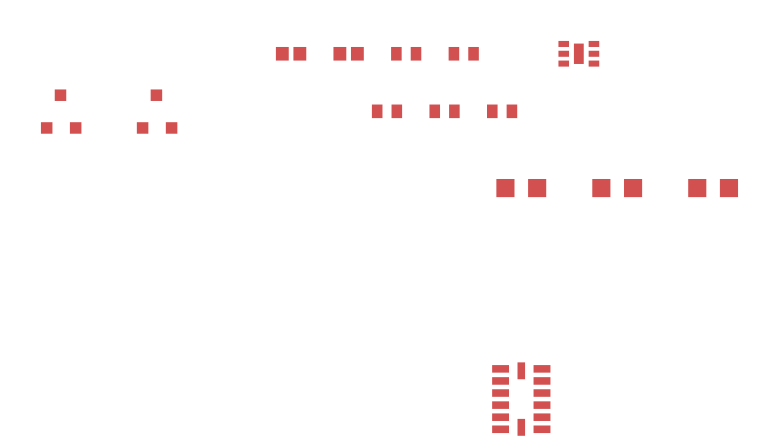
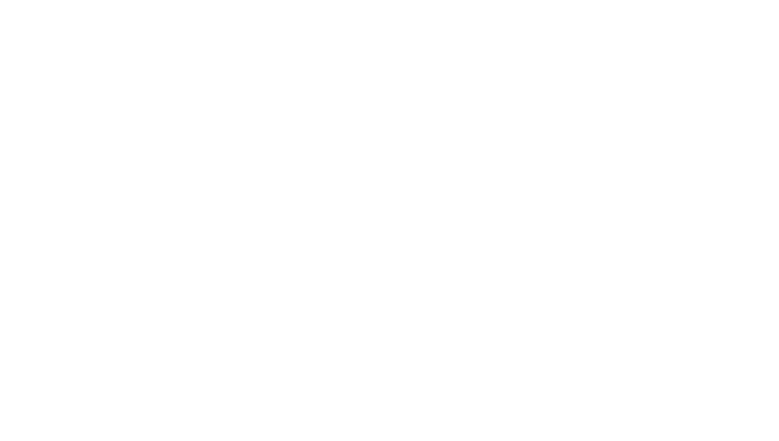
part: (291, 53) -> none
part: (348, 53) -> none
part: (406, 53) -> none
part: (463, 53) -> none
part: (578, 53) -> none
part: (61, 111) -> none
part: (157, 111) -> none
part: (387, 111) -> none
part: (444, 111) -> none
part: (502, 111) -> none
part: (521, 188) -> none
part: (617, 188) -> none
part: (713, 188) -> none
part: (521, 399) -> none

